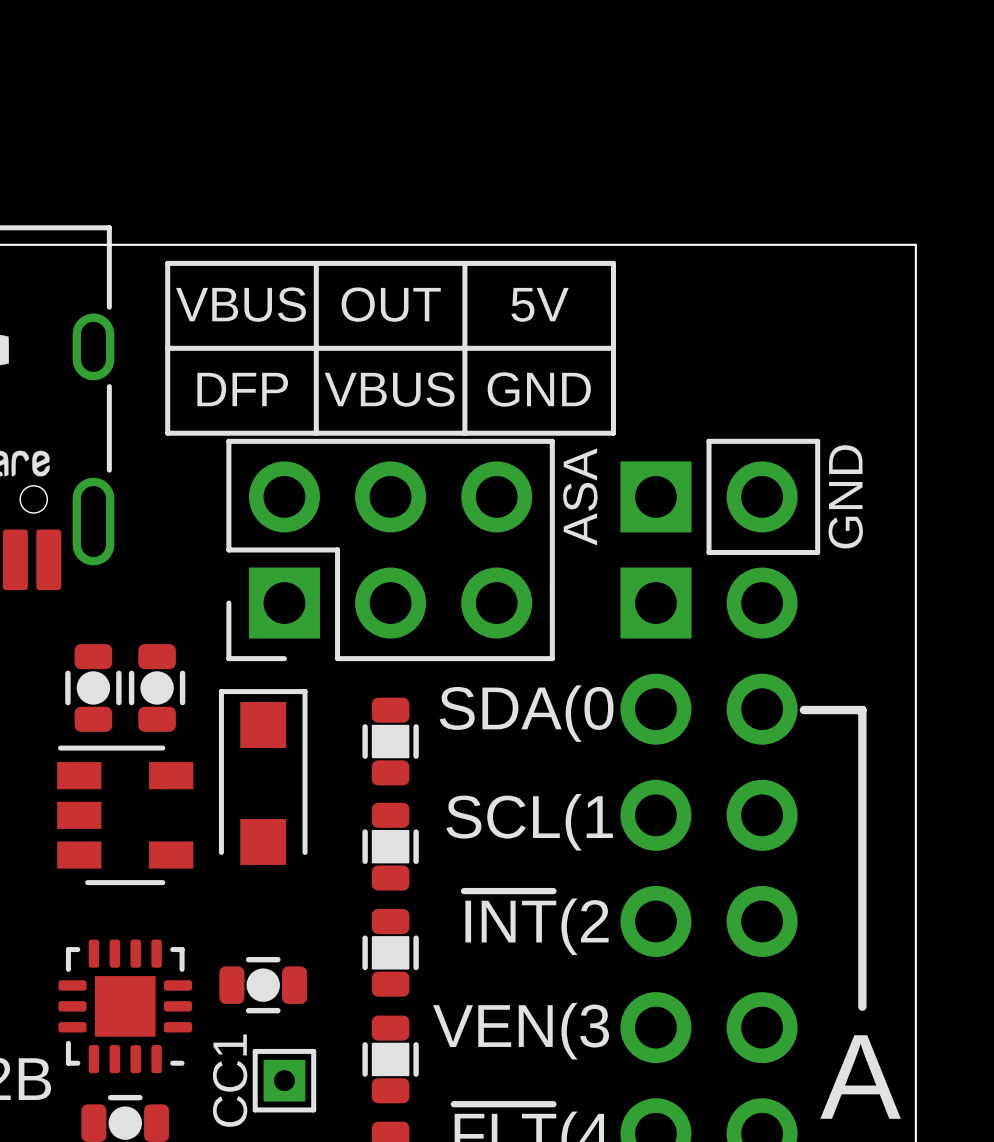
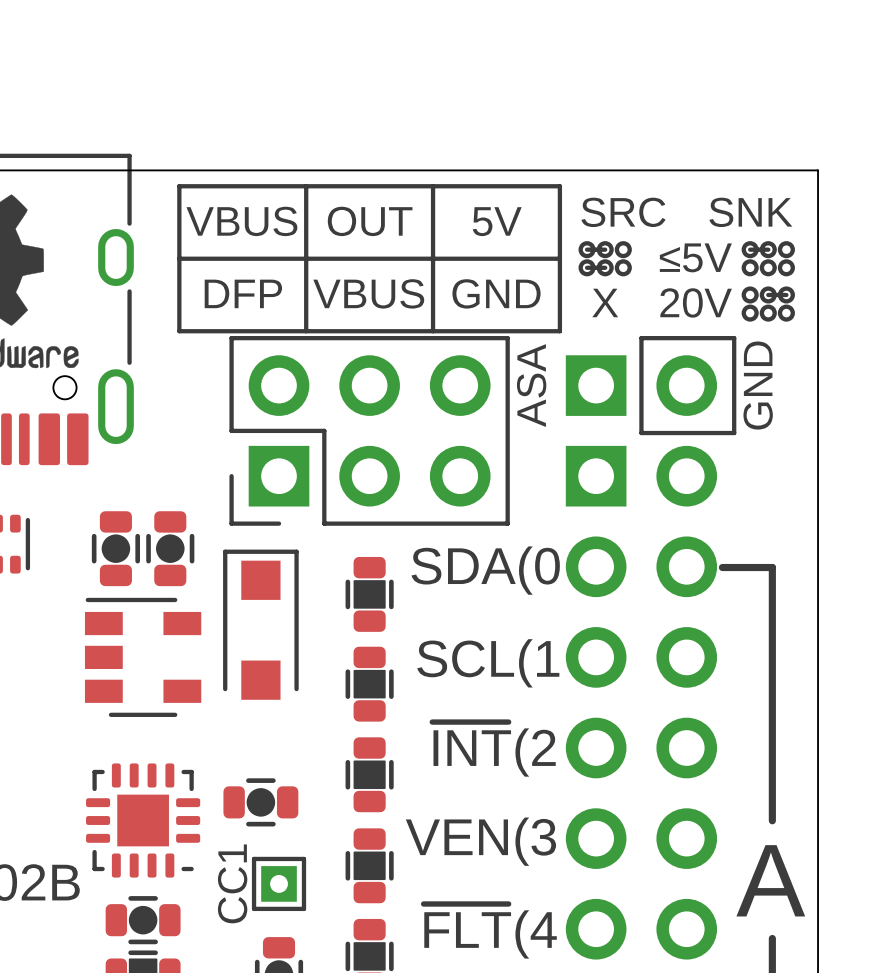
text: none -> SRC (623, 212)
text: none -> SNK (750, 212)
drawing: none -> [578, 241, 632, 277]
drawing: none -> [741, 241, 795, 322]
line: none -> (587, 249) (605, 249)
line: none -> (750, 249) (768, 249)
text: none -> ≤5V (695, 257)
line: none -> (587, 267) (605, 267)
line: none -> (768, 294) (786, 294)
text: none -> X (605, 302)
text: none -> 20V (696, 302)

